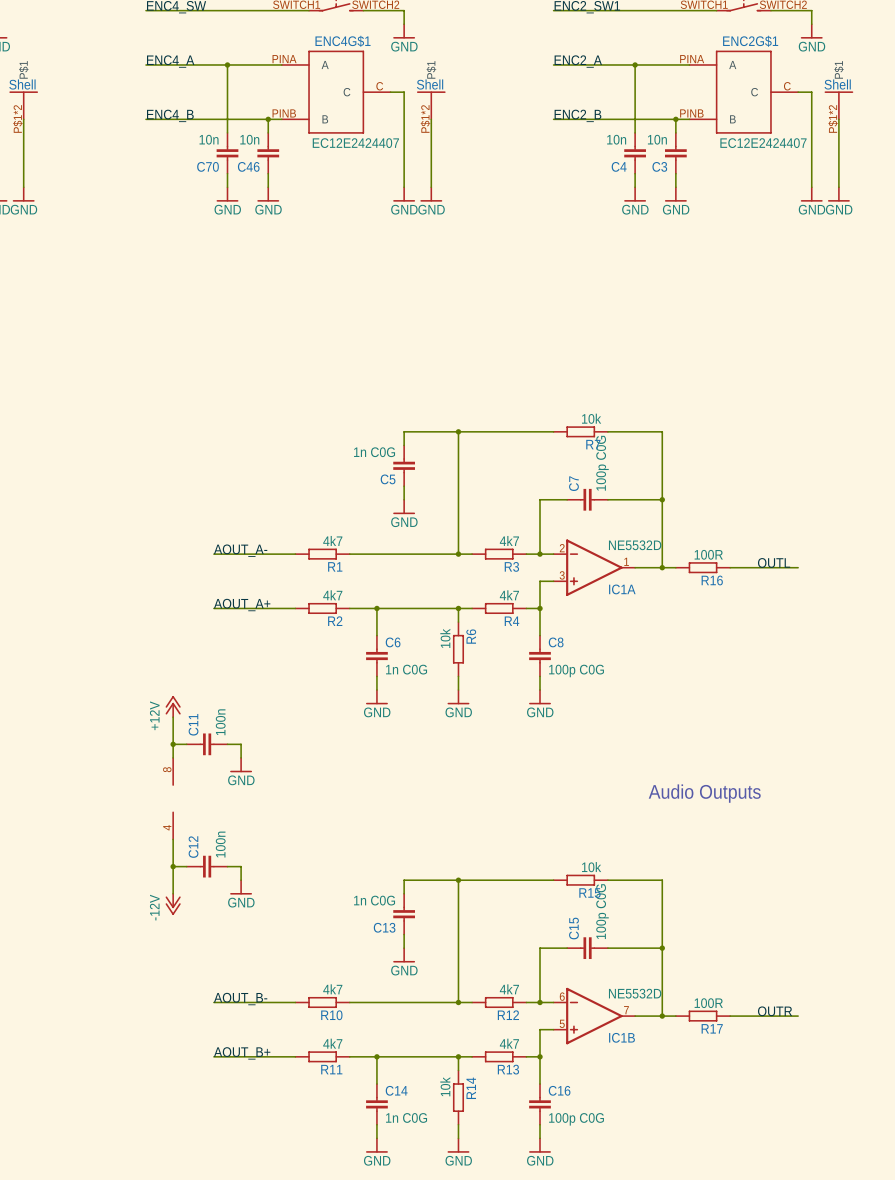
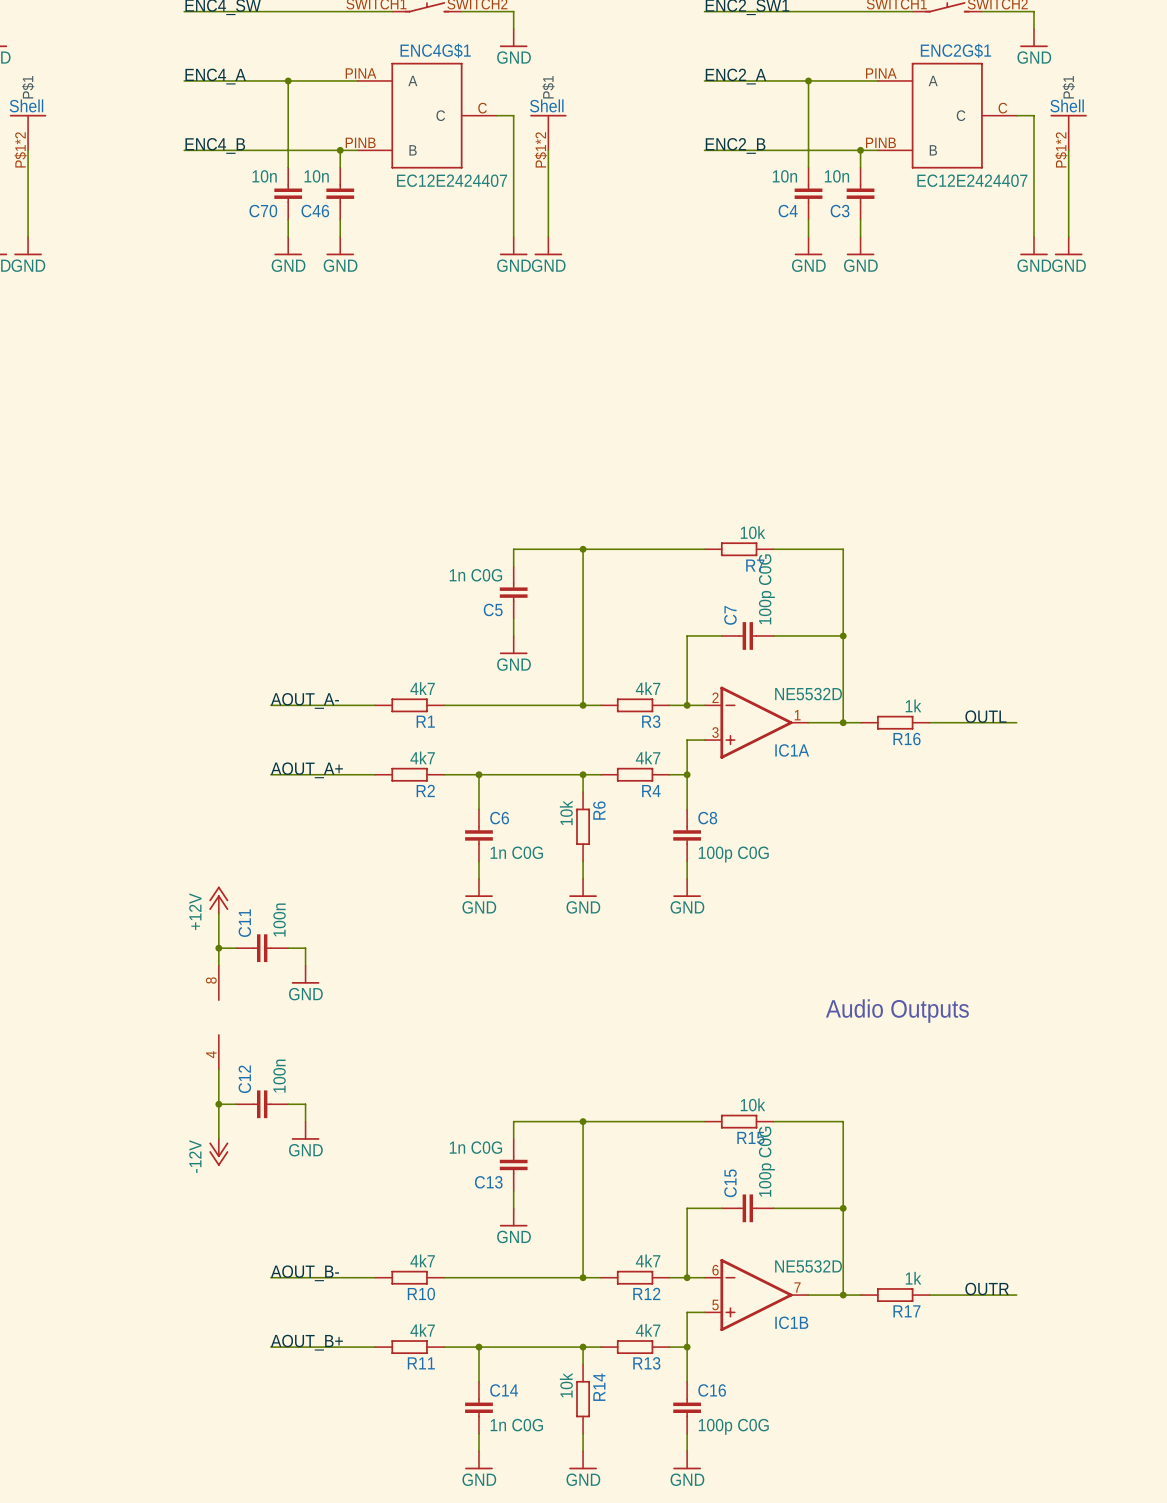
R16 value: 100R (708, 554) -> 1k (913, 705)
R17 value: 100R (708, 1003) -> 1k (913, 1278)

